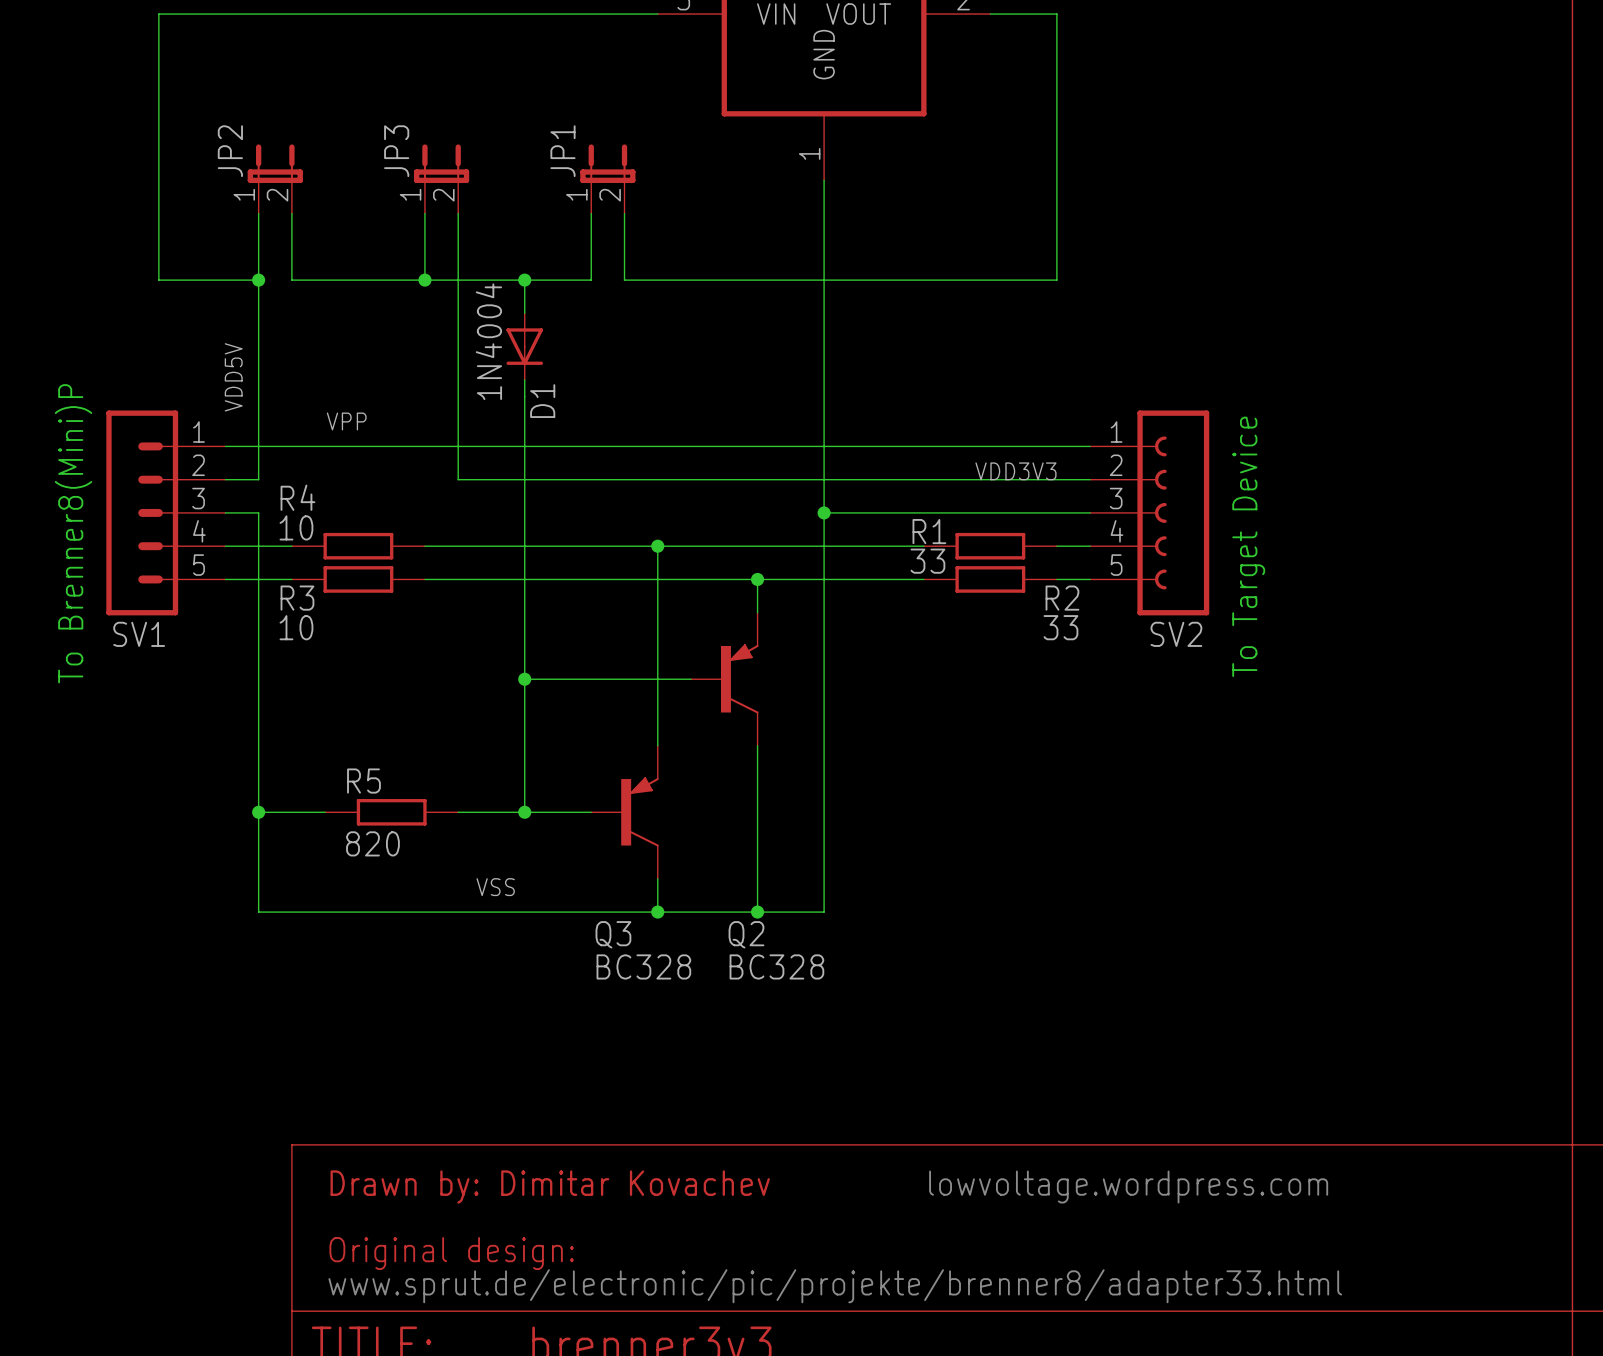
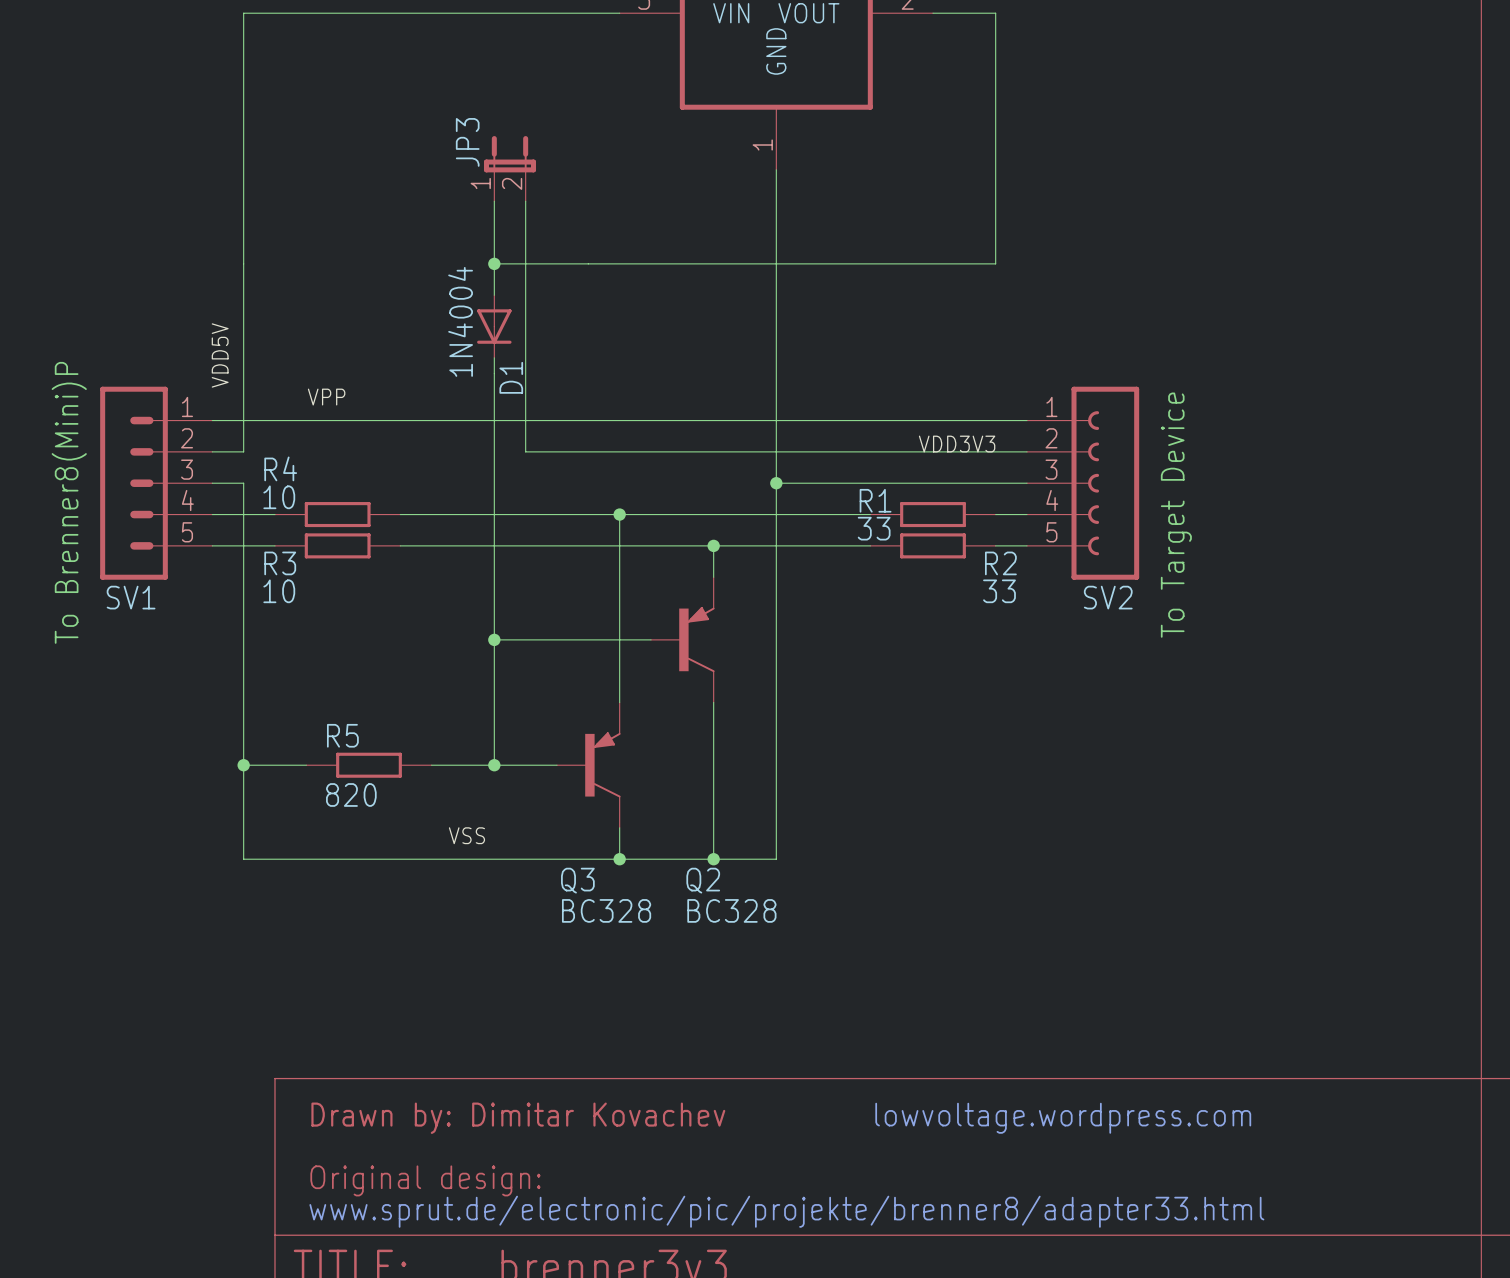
wire: (258, 14) (158, 14) (158, 280) (258, 280) -> (243, 13) (243, 201)
JP2: (275, 179) -> none
JP3 position: (441, 179) -> (509, 168)
JP1: (607, 179) -> none
wire: (291, 213) (291, 280) (524, 280) -> (494, 201) (494, 263)
wire: (424, 213) (424, 280) -> none
wire: (458, 213) (458, 479) (557, 479) -> (525, 201) (525, 451)
wire: (591, 213) (591, 280) -> (588, 263) (557, 263)
wire: (624, 213) (624, 280) -> none
junction: (258, 280) -> none
junction: (424, 280) -> none

